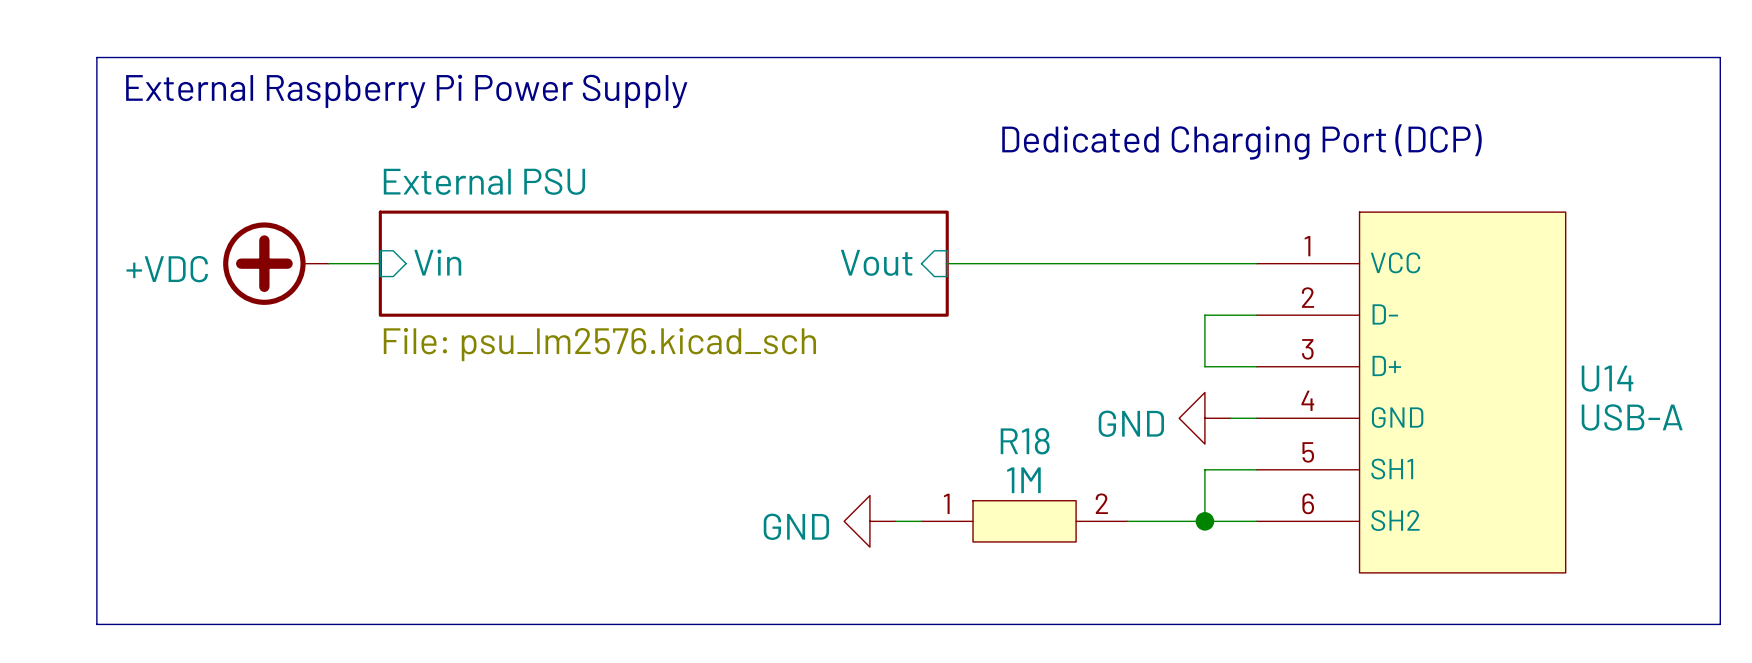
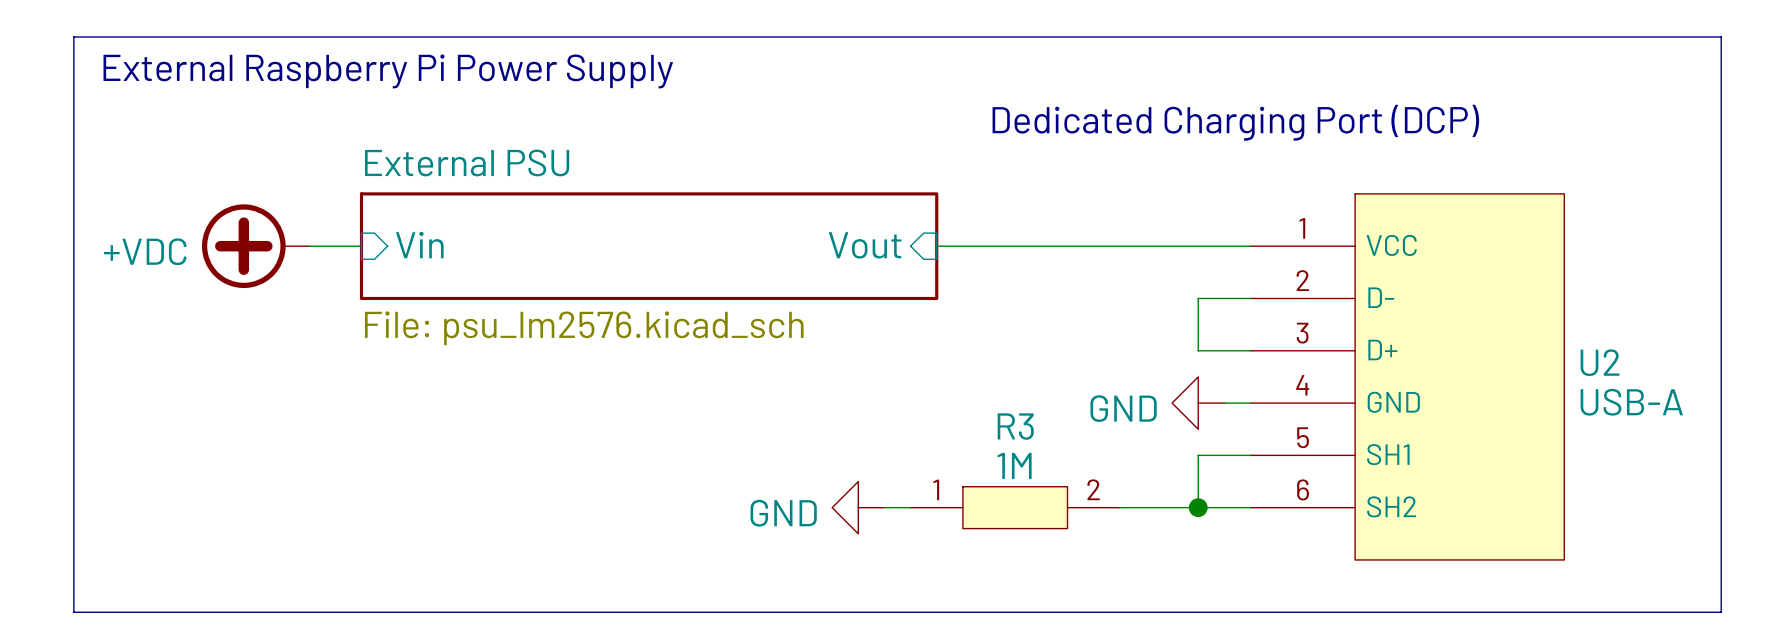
U14 name: U14 (1607, 378) -> U2 (1600, 362)
R18 name: R18 (1025, 441) -> R3 (1015, 426)

